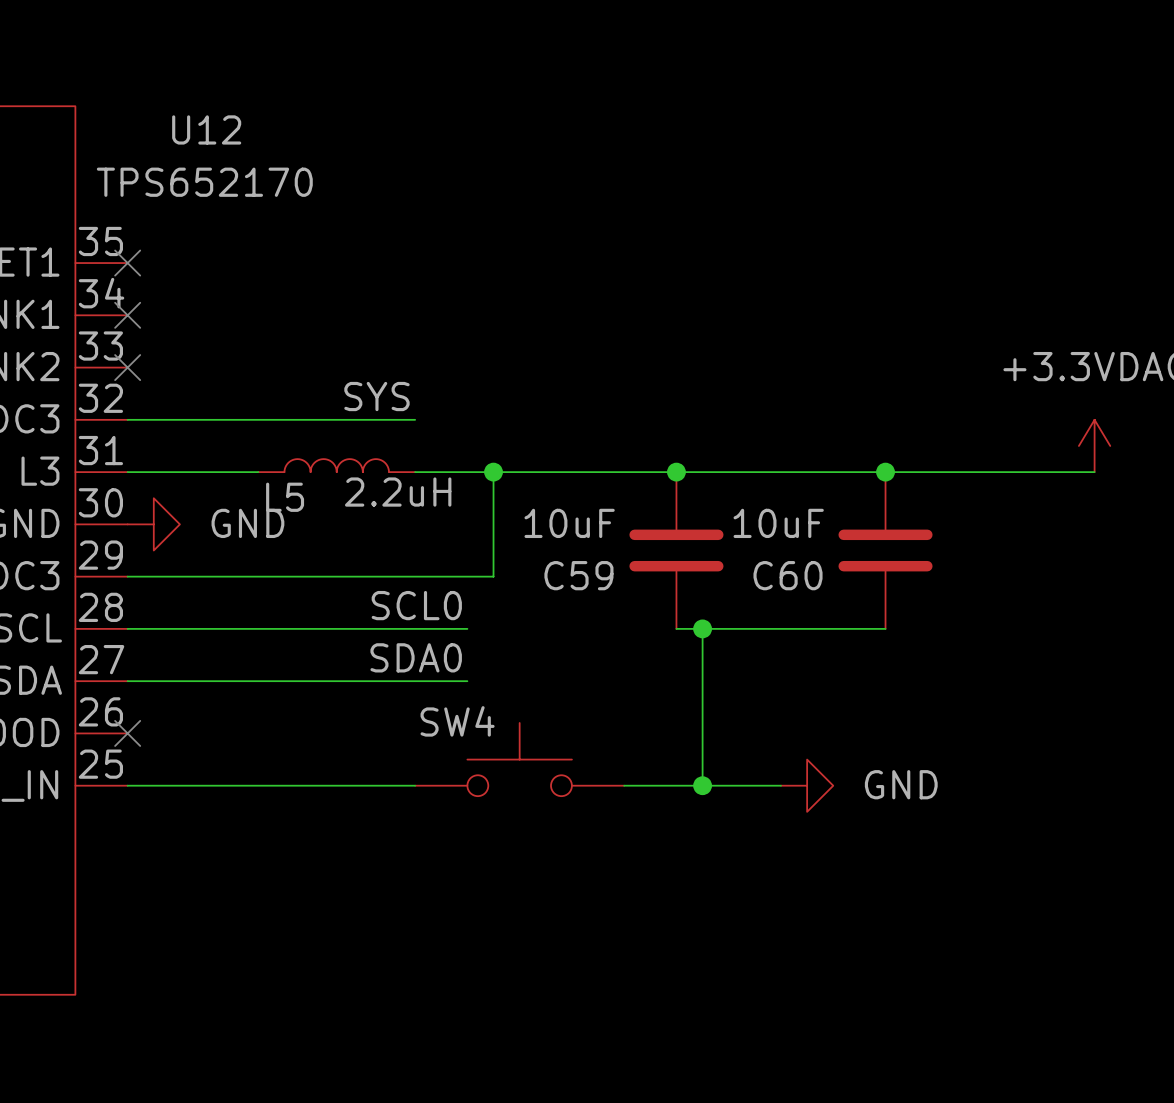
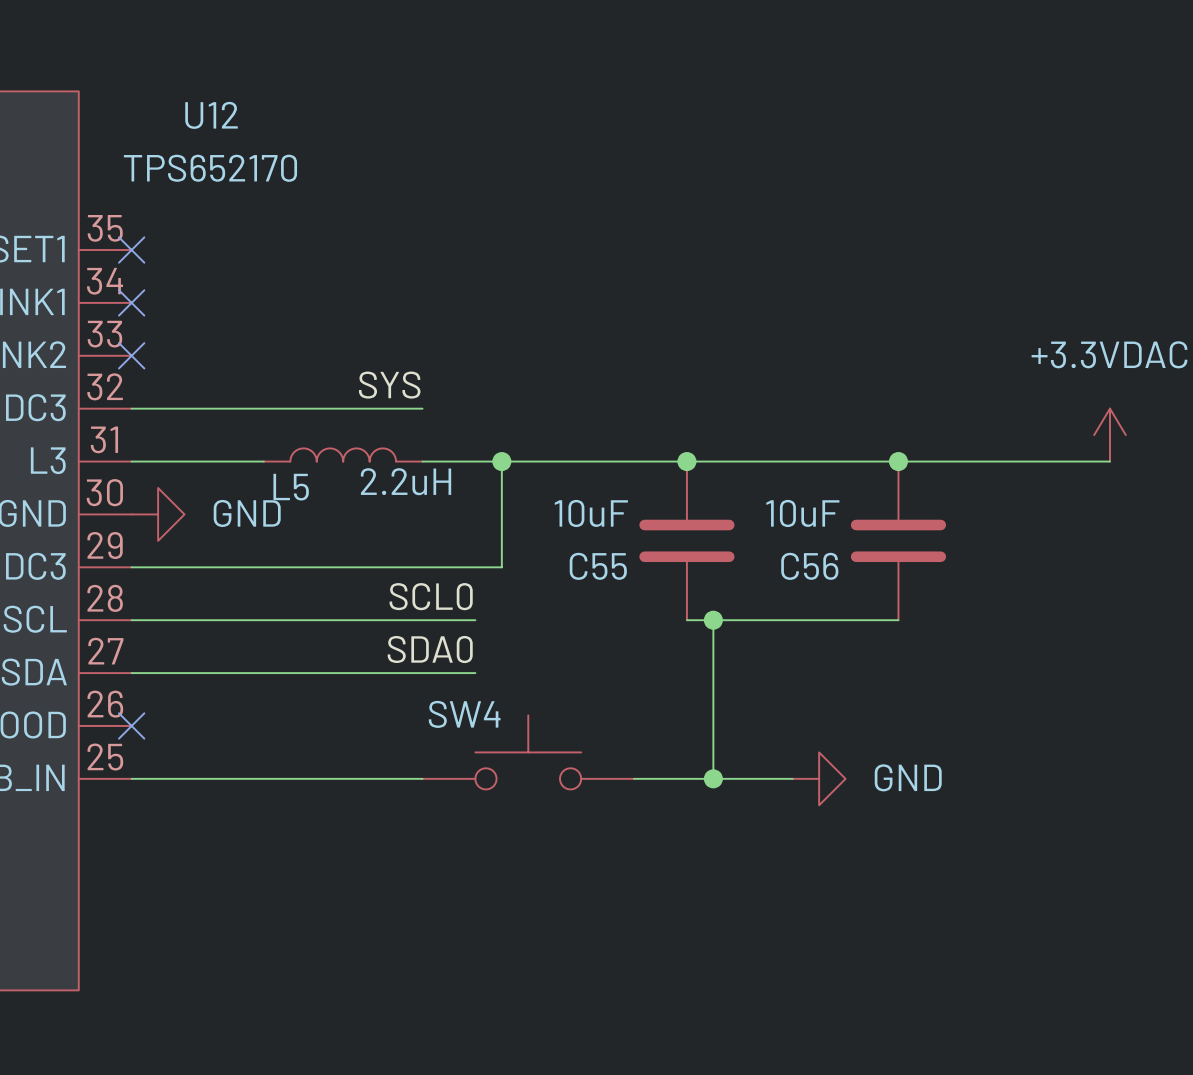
C59 name: C59 (578, 575) -> C55 (598, 566)
C60 name: C60 (788, 575) -> C56 (809, 566)

